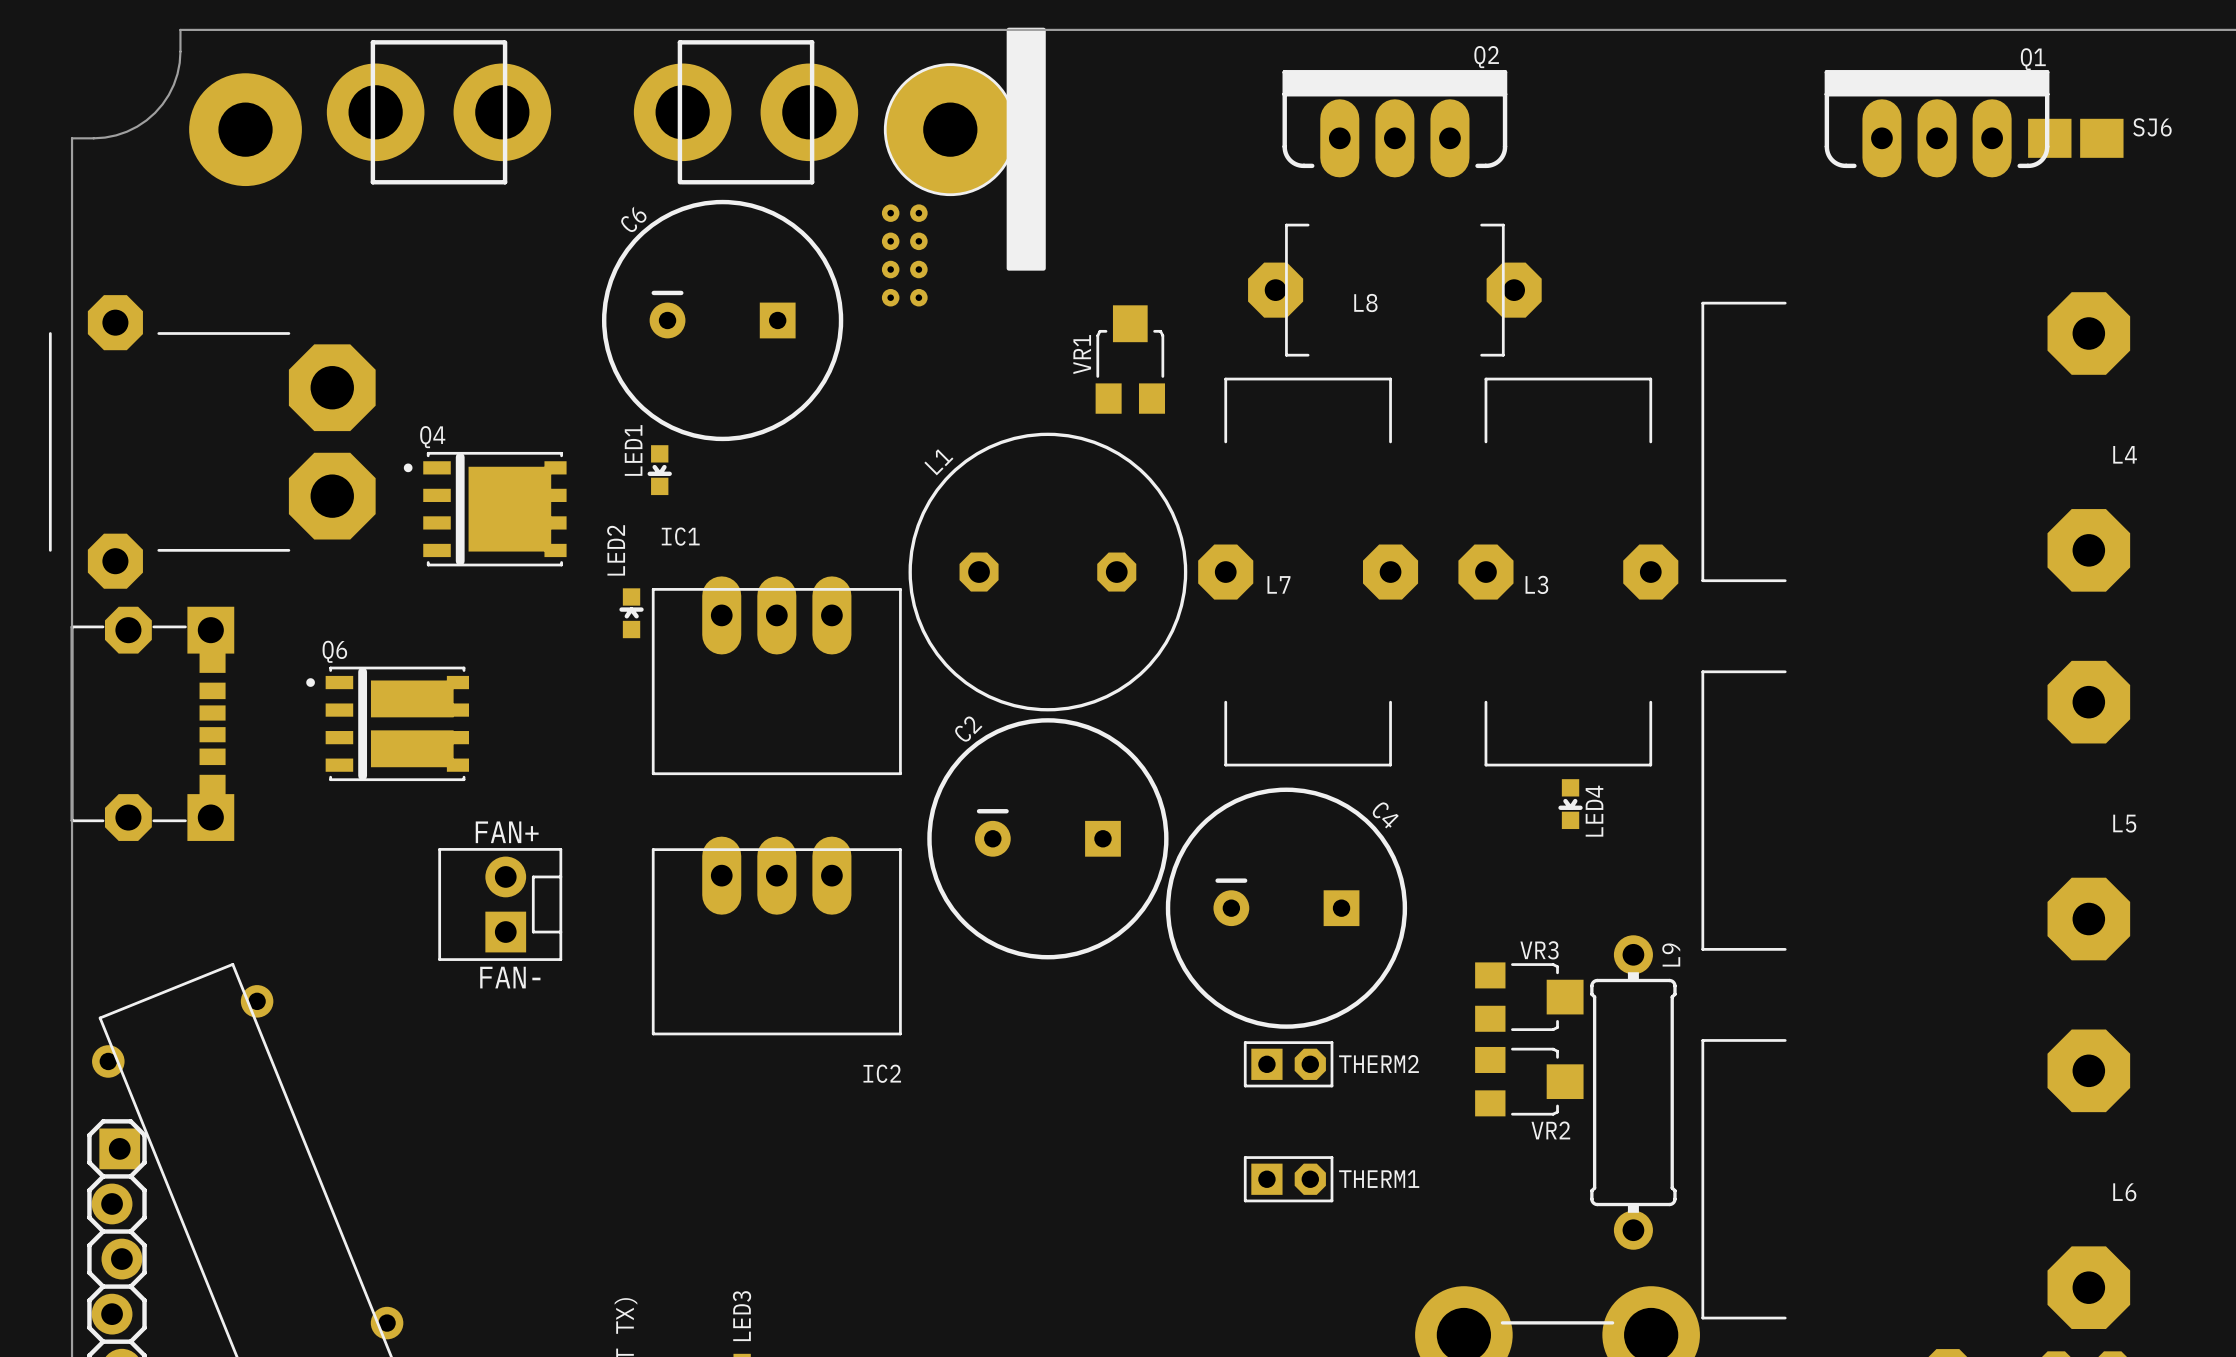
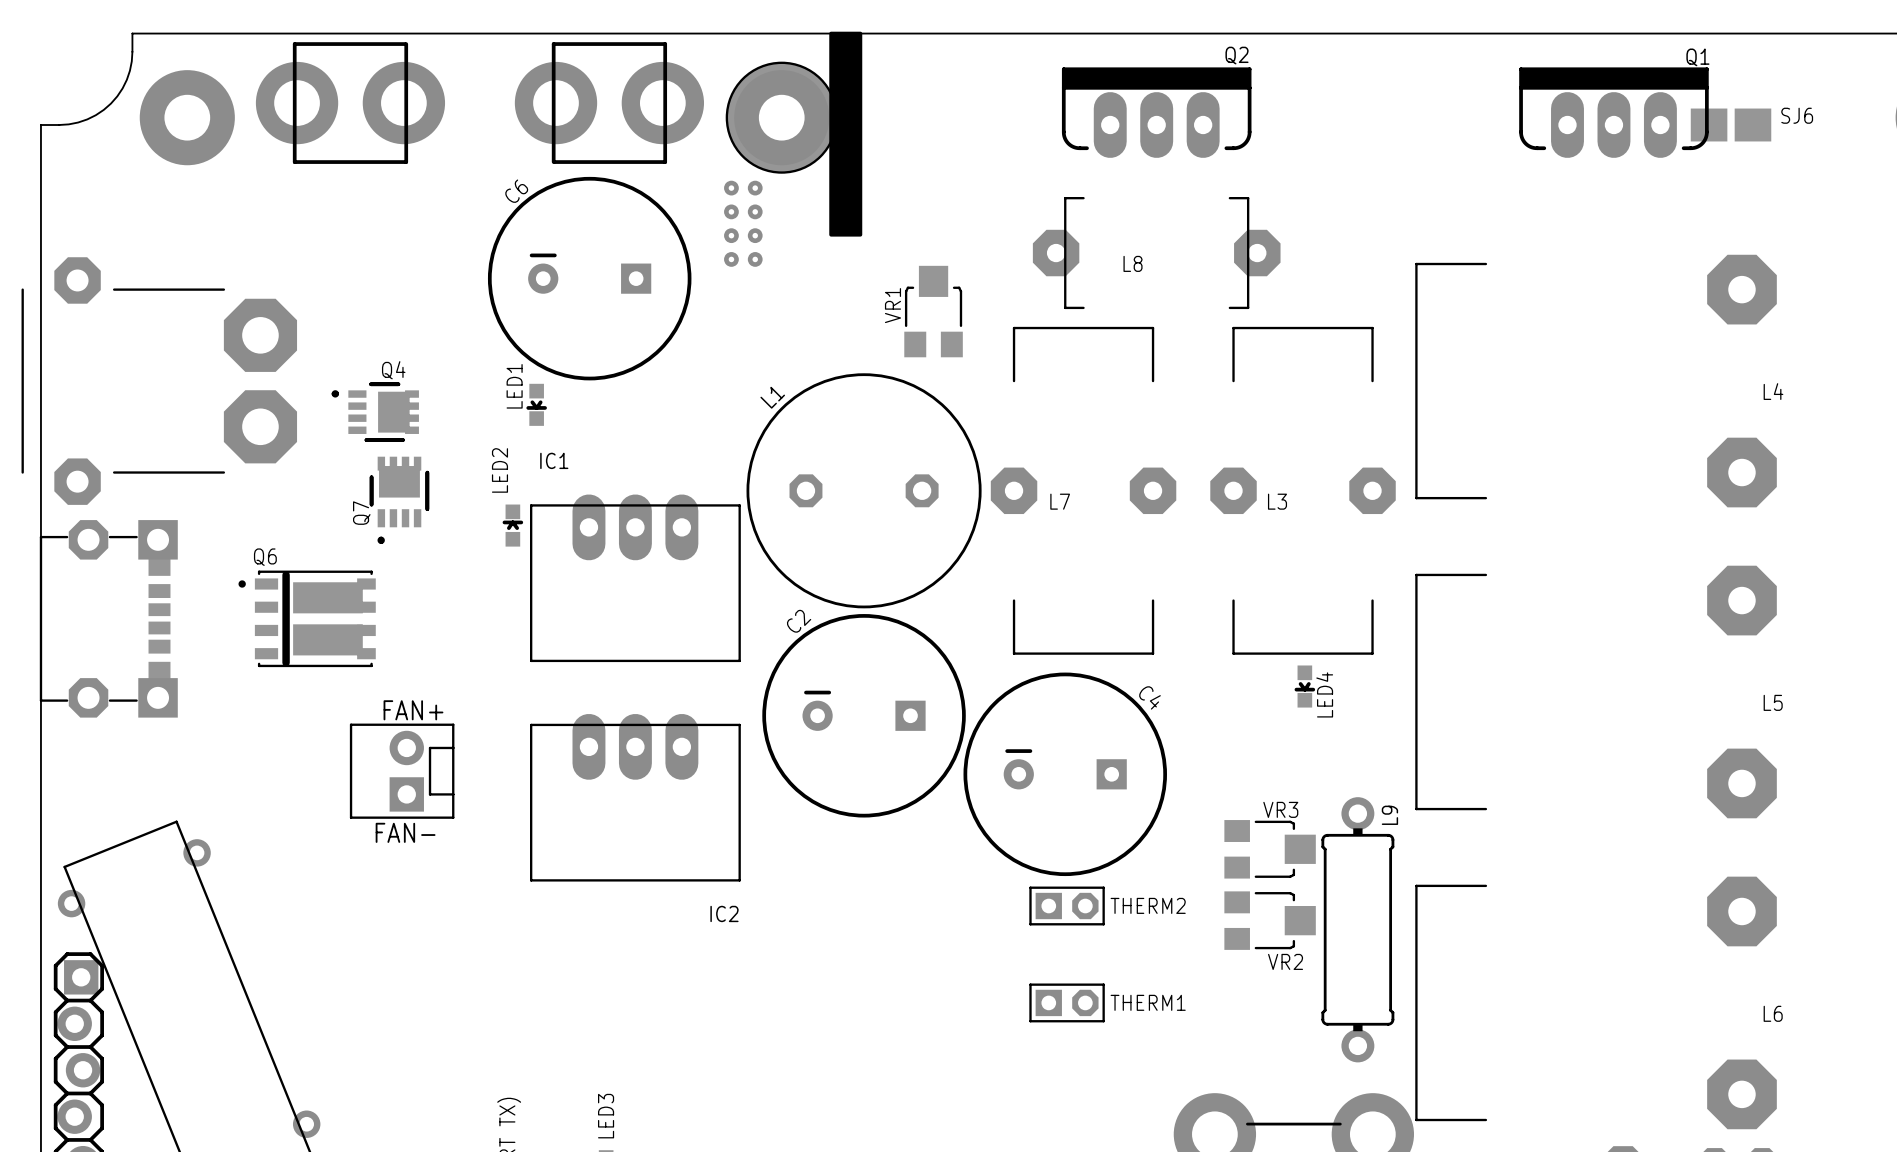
Q4 name position: Q4 (432, 437) -> Q4 (393, 370)
Q4 footprint: [403, 451, 567, 567] -> [331, 382, 419, 442]
line: (460, 457) (460, 561) -> none
Q7: none -> (399, 500)

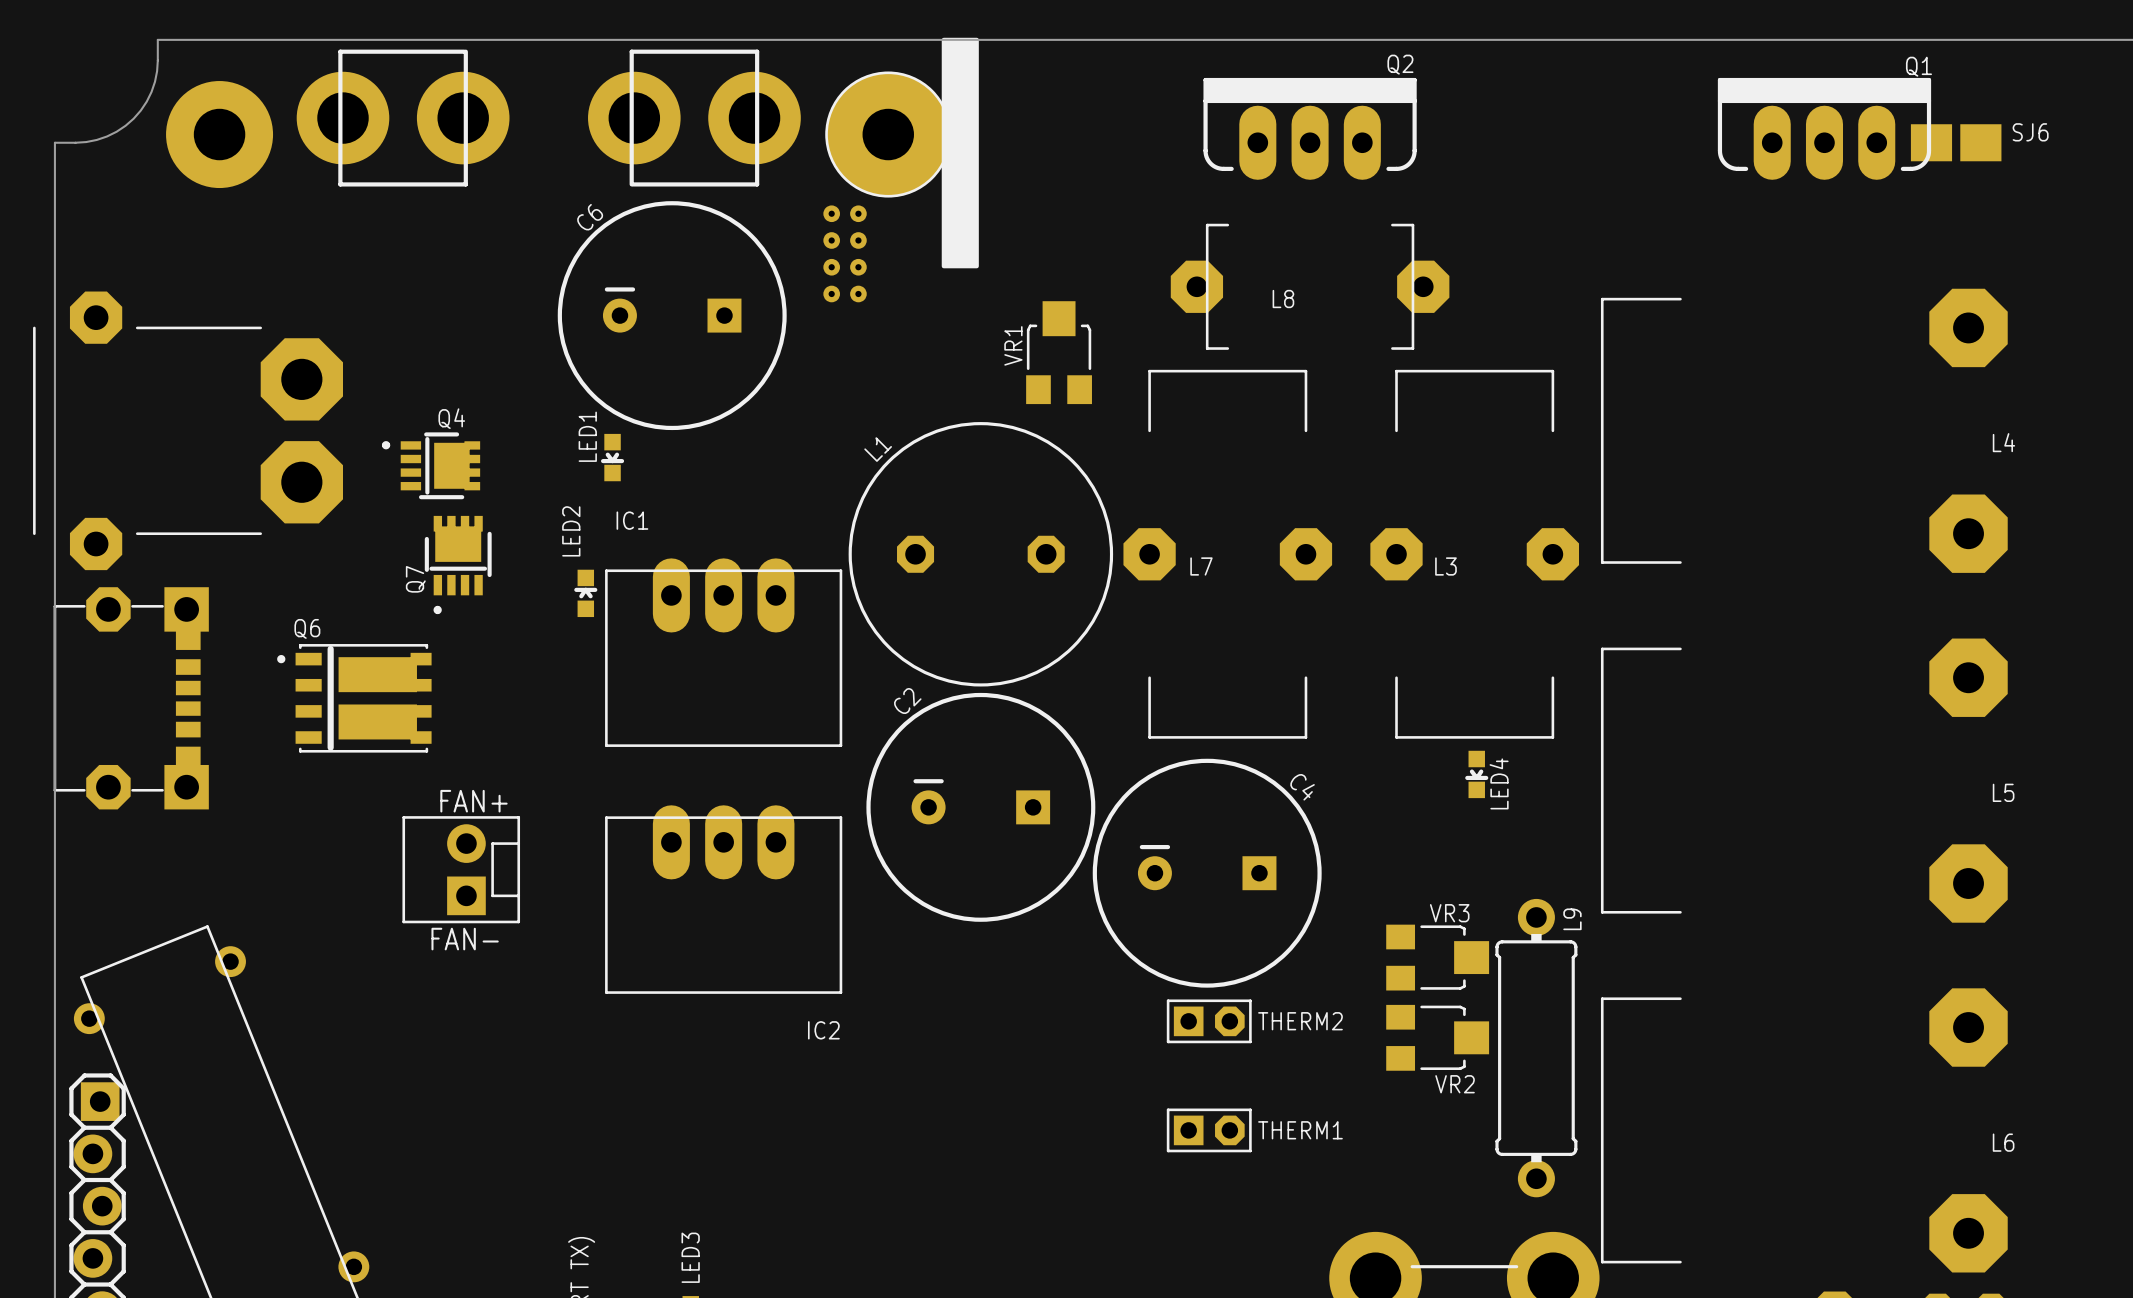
Q4 footprint: [331, 382, 419, 442] -> [381, 432, 481, 500]
Q7 footprint: [369, 456, 430, 544] -> [424, 515, 492, 615]
Q6 footprint: [238, 570, 376, 668] -> [277, 644, 432, 753]
line: (286, 574) (286, 662) -> none

